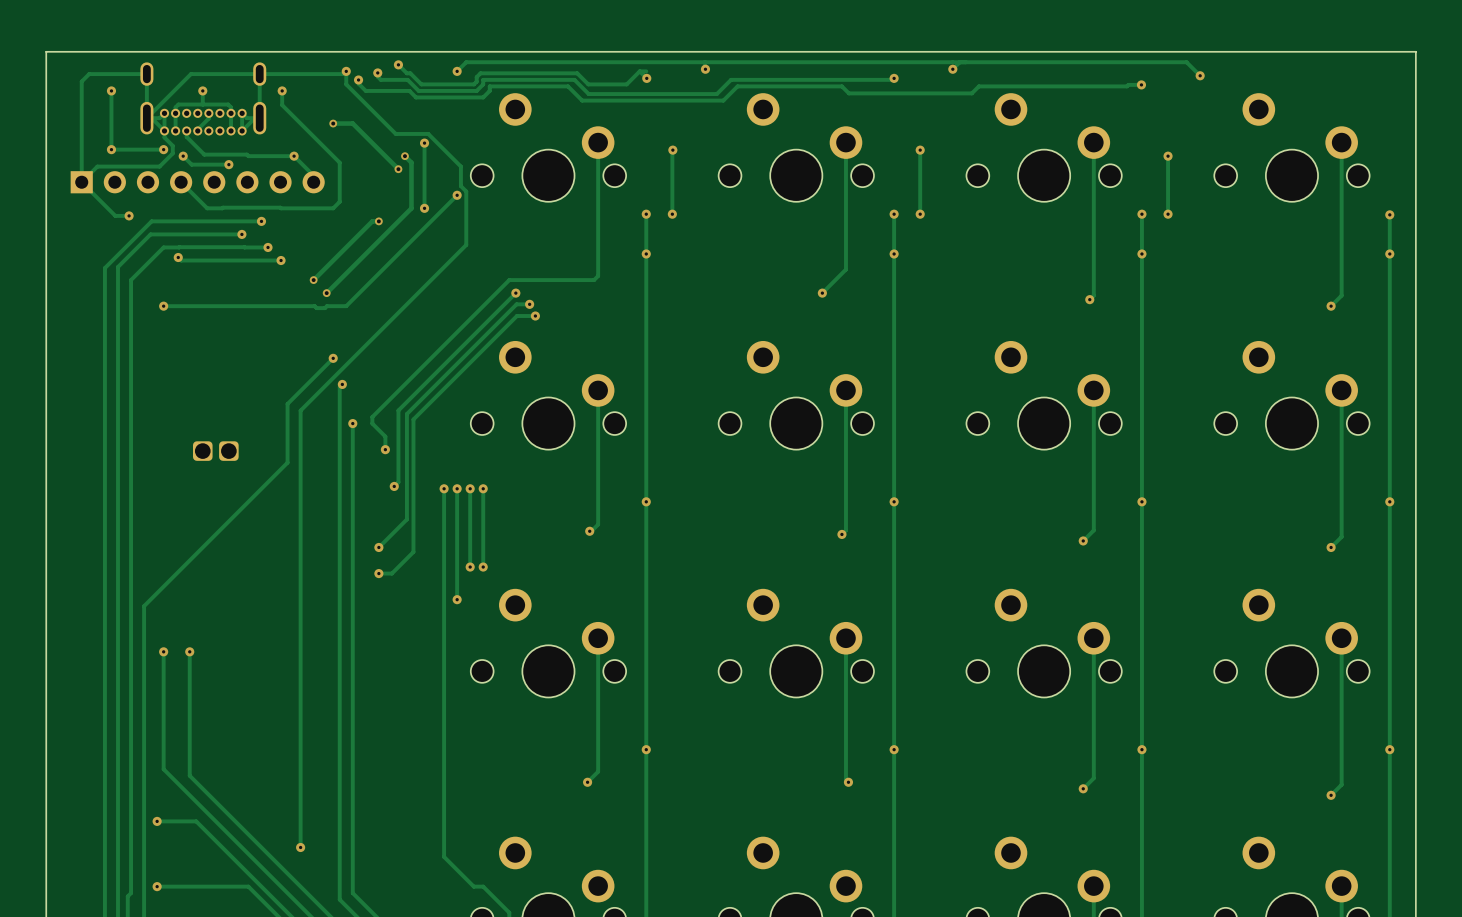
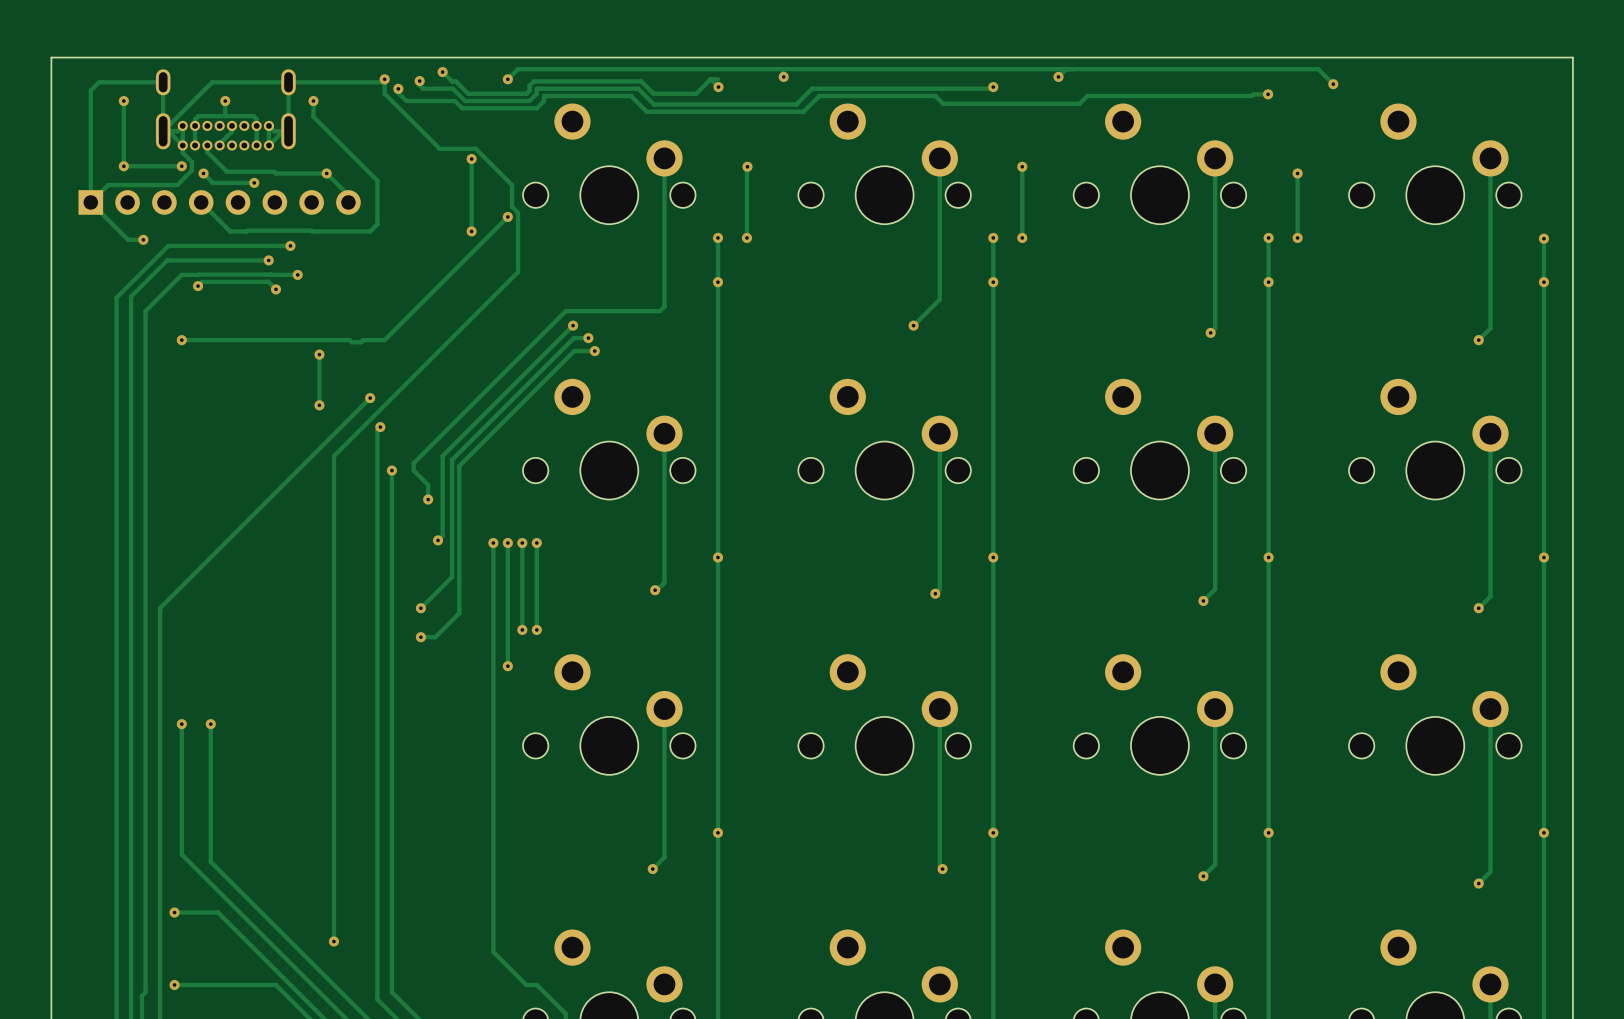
track: (333, 123) (352, 123) (398, 169) -> none
via: (333, 123) -> none
track: (404, 156) (411, 162) (411, 208) (326, 293) -> none
via: (404, 156) -> none
via: (398, 169) -> none
track: (378, 221) (372, 221) (313, 280) -> none
via: (378, 221) -> none
track: (178, 257) (181, 260) (281, 260) -> (198, 286) (202, 281) (268, 281) (275, 289)
via: none -> (275, 289)
via: (281, 260) -> none
via: (313, 280) -> none
via: (326, 293) -> none
track: none -> (319, 354) (319, 405)
via: none -> (319, 354)
via: none -> (319, 405)
track: (287, 403) (287, 462) (144, 606) -> (319, 448) (160, 608) (160, 673)
part: (215, 451) -> none

